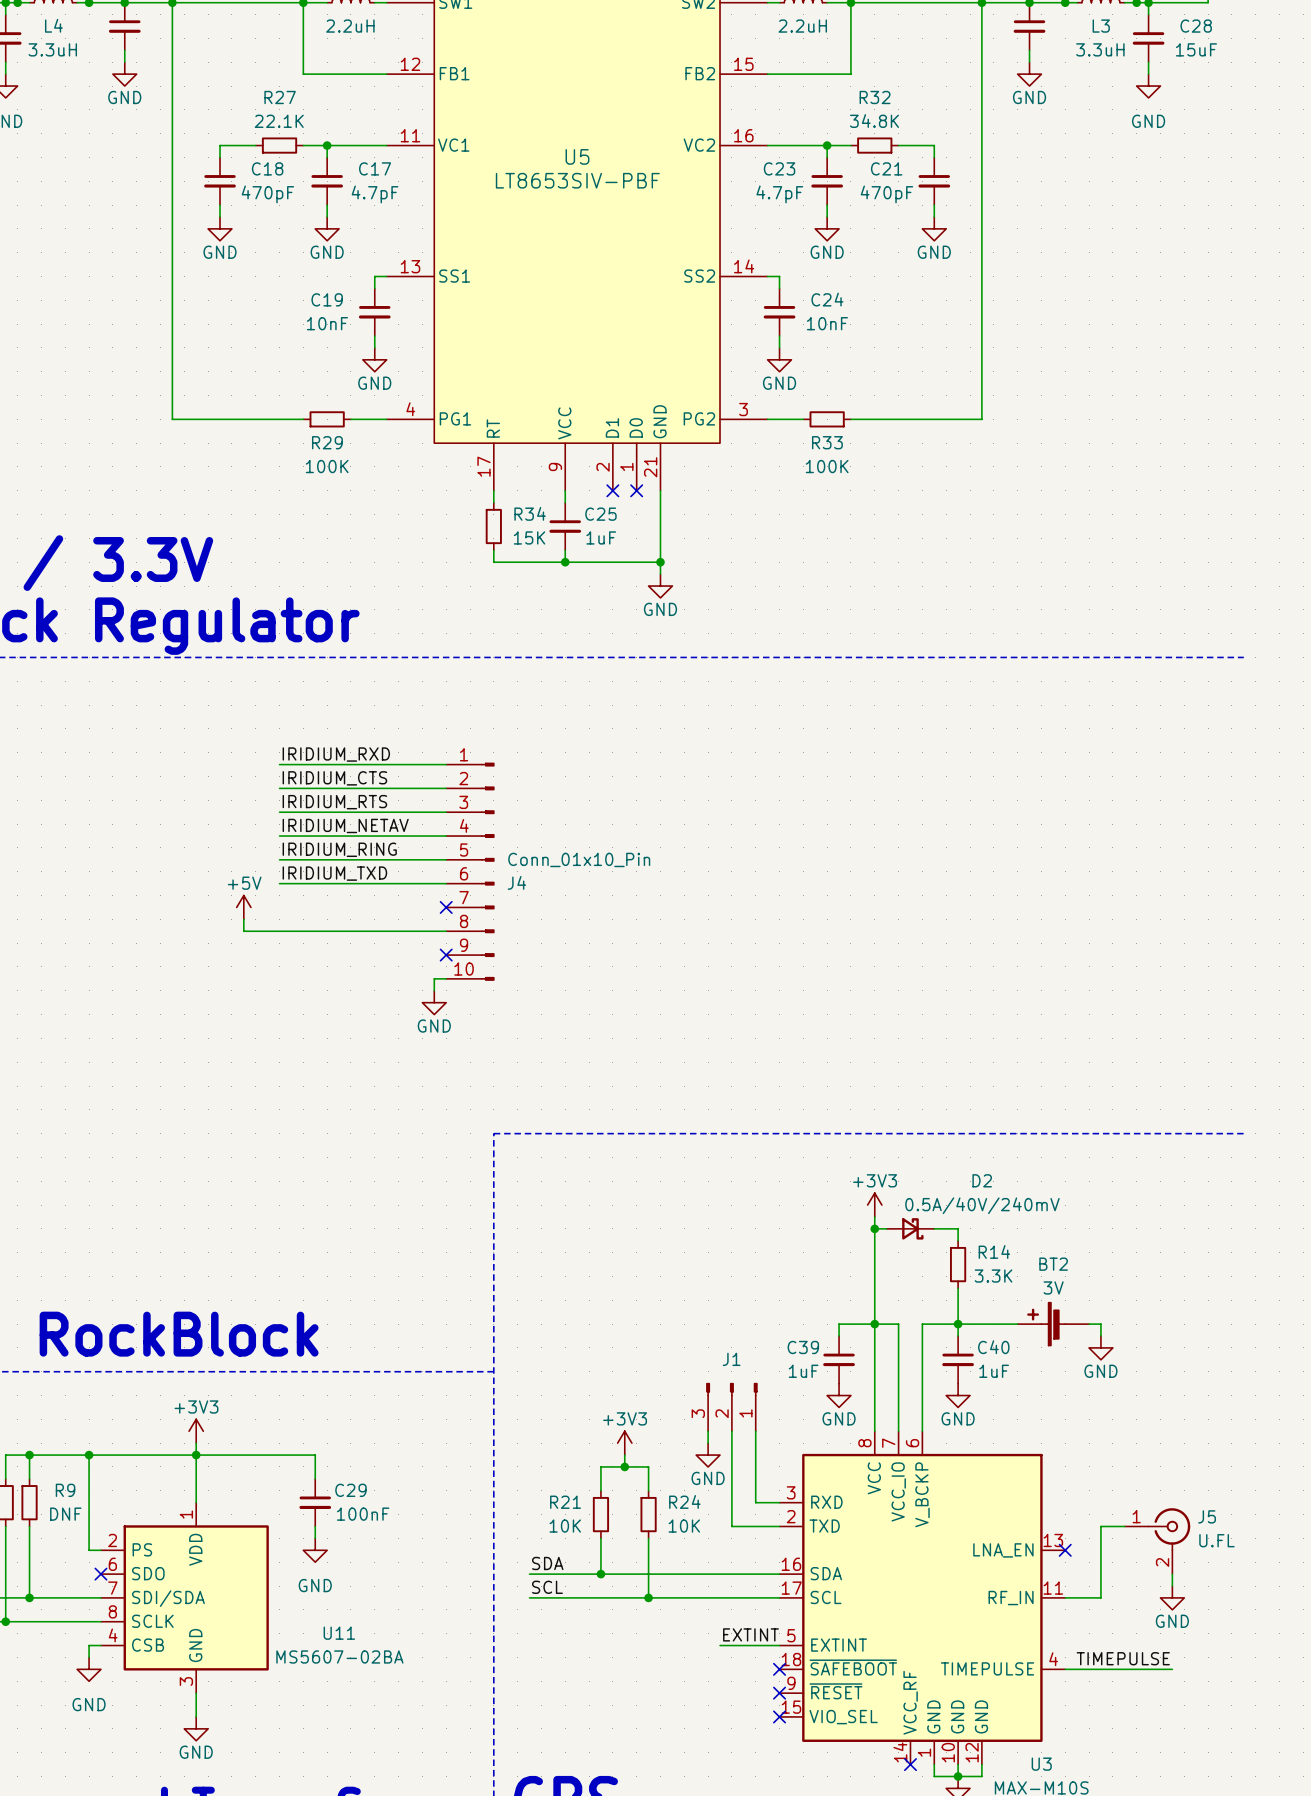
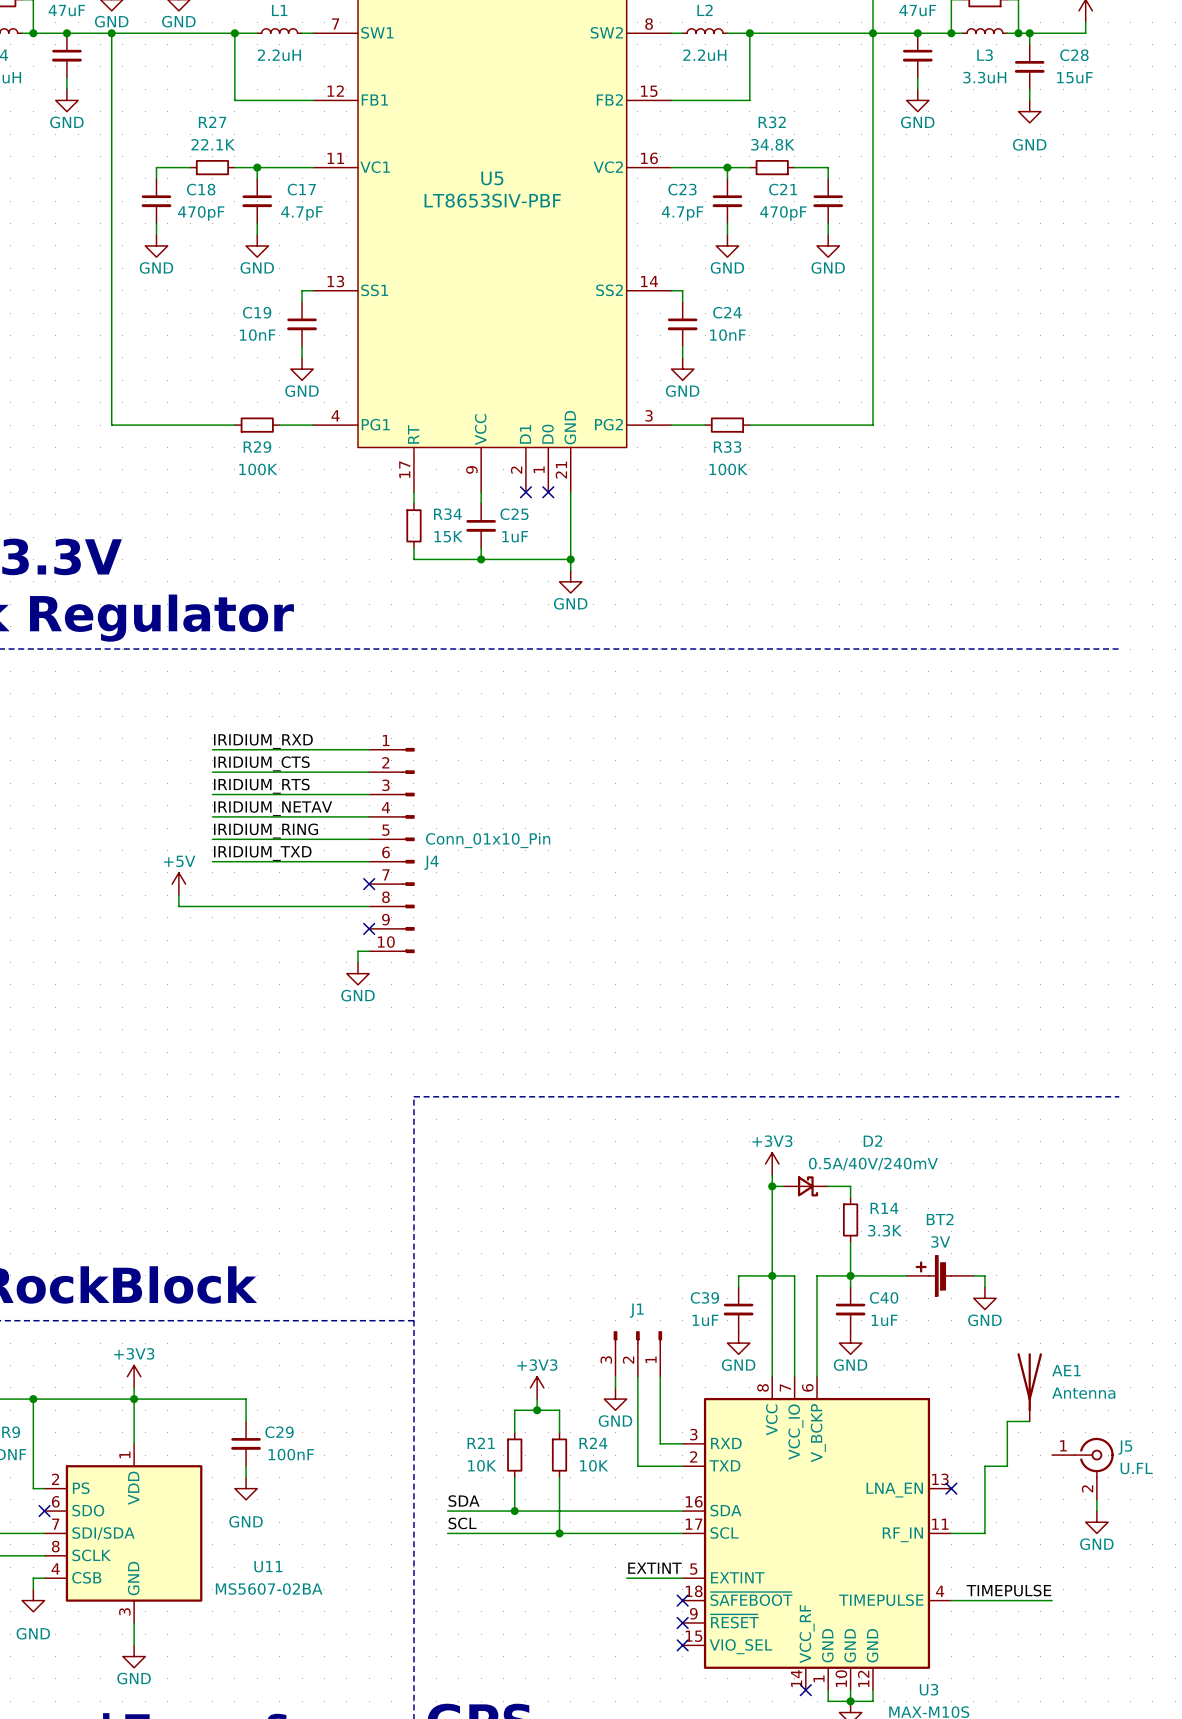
AE1: none -> Antenna (1029, 1387)
wire: none -> (1029, 1421) (1007, 1421) (1007, 1466)
J5 position: (1157, 1541) -> (1082, 1468)
wire: (1172, 1574) (1172, 1586) -> (1096, 1499) (1096, 1511)
power symbol position: GND (1172, 1597) -> GND (1096, 1522)

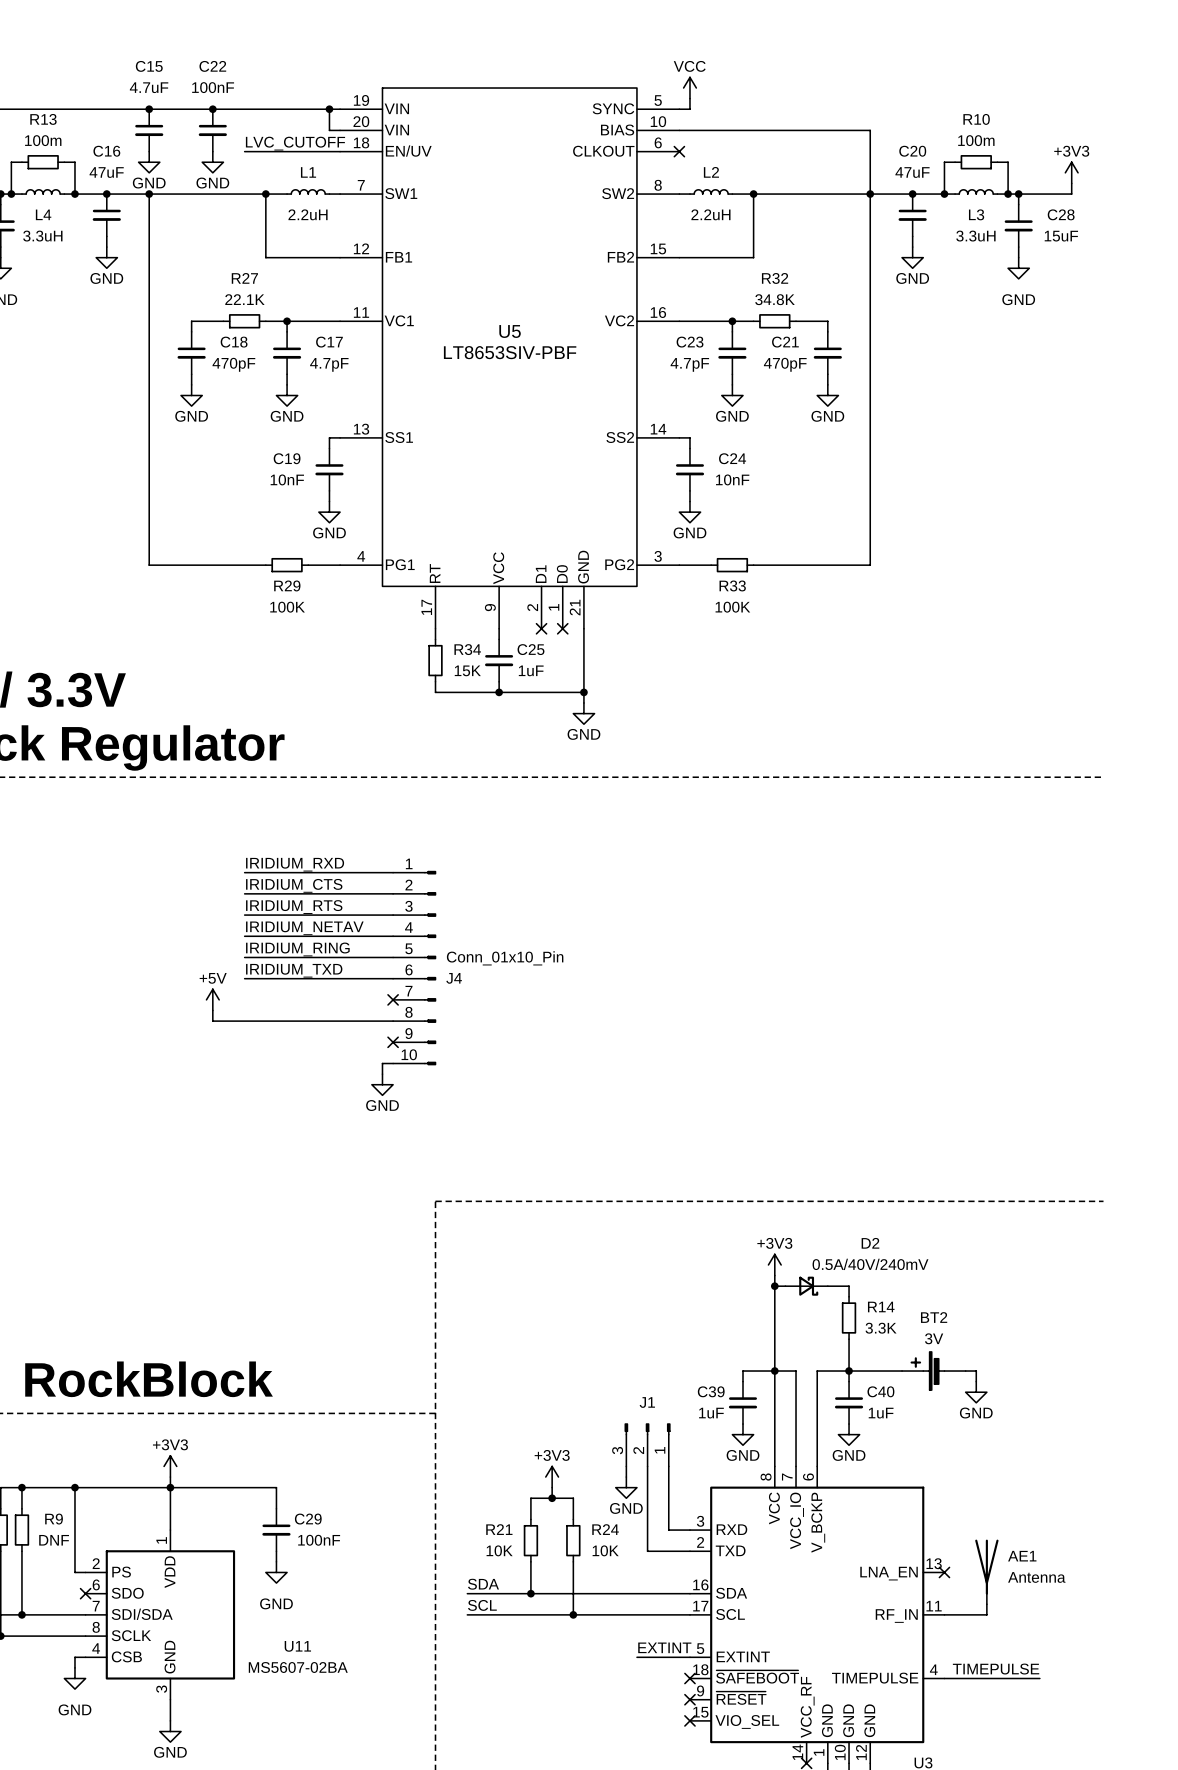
AE1 position: (1029, 1387) -> (986, 1571)
wire: (1029, 1421) (1007, 1421) (1007, 1466) (984, 1466) (984, 1533) -> (986, 1604) (986, 1614) (976, 1614)
J5: U.FL (1082, 1468) -> none
wire: (1096, 1499) (1096, 1511) -> none
power symbol: GND (1096, 1522) -> none

